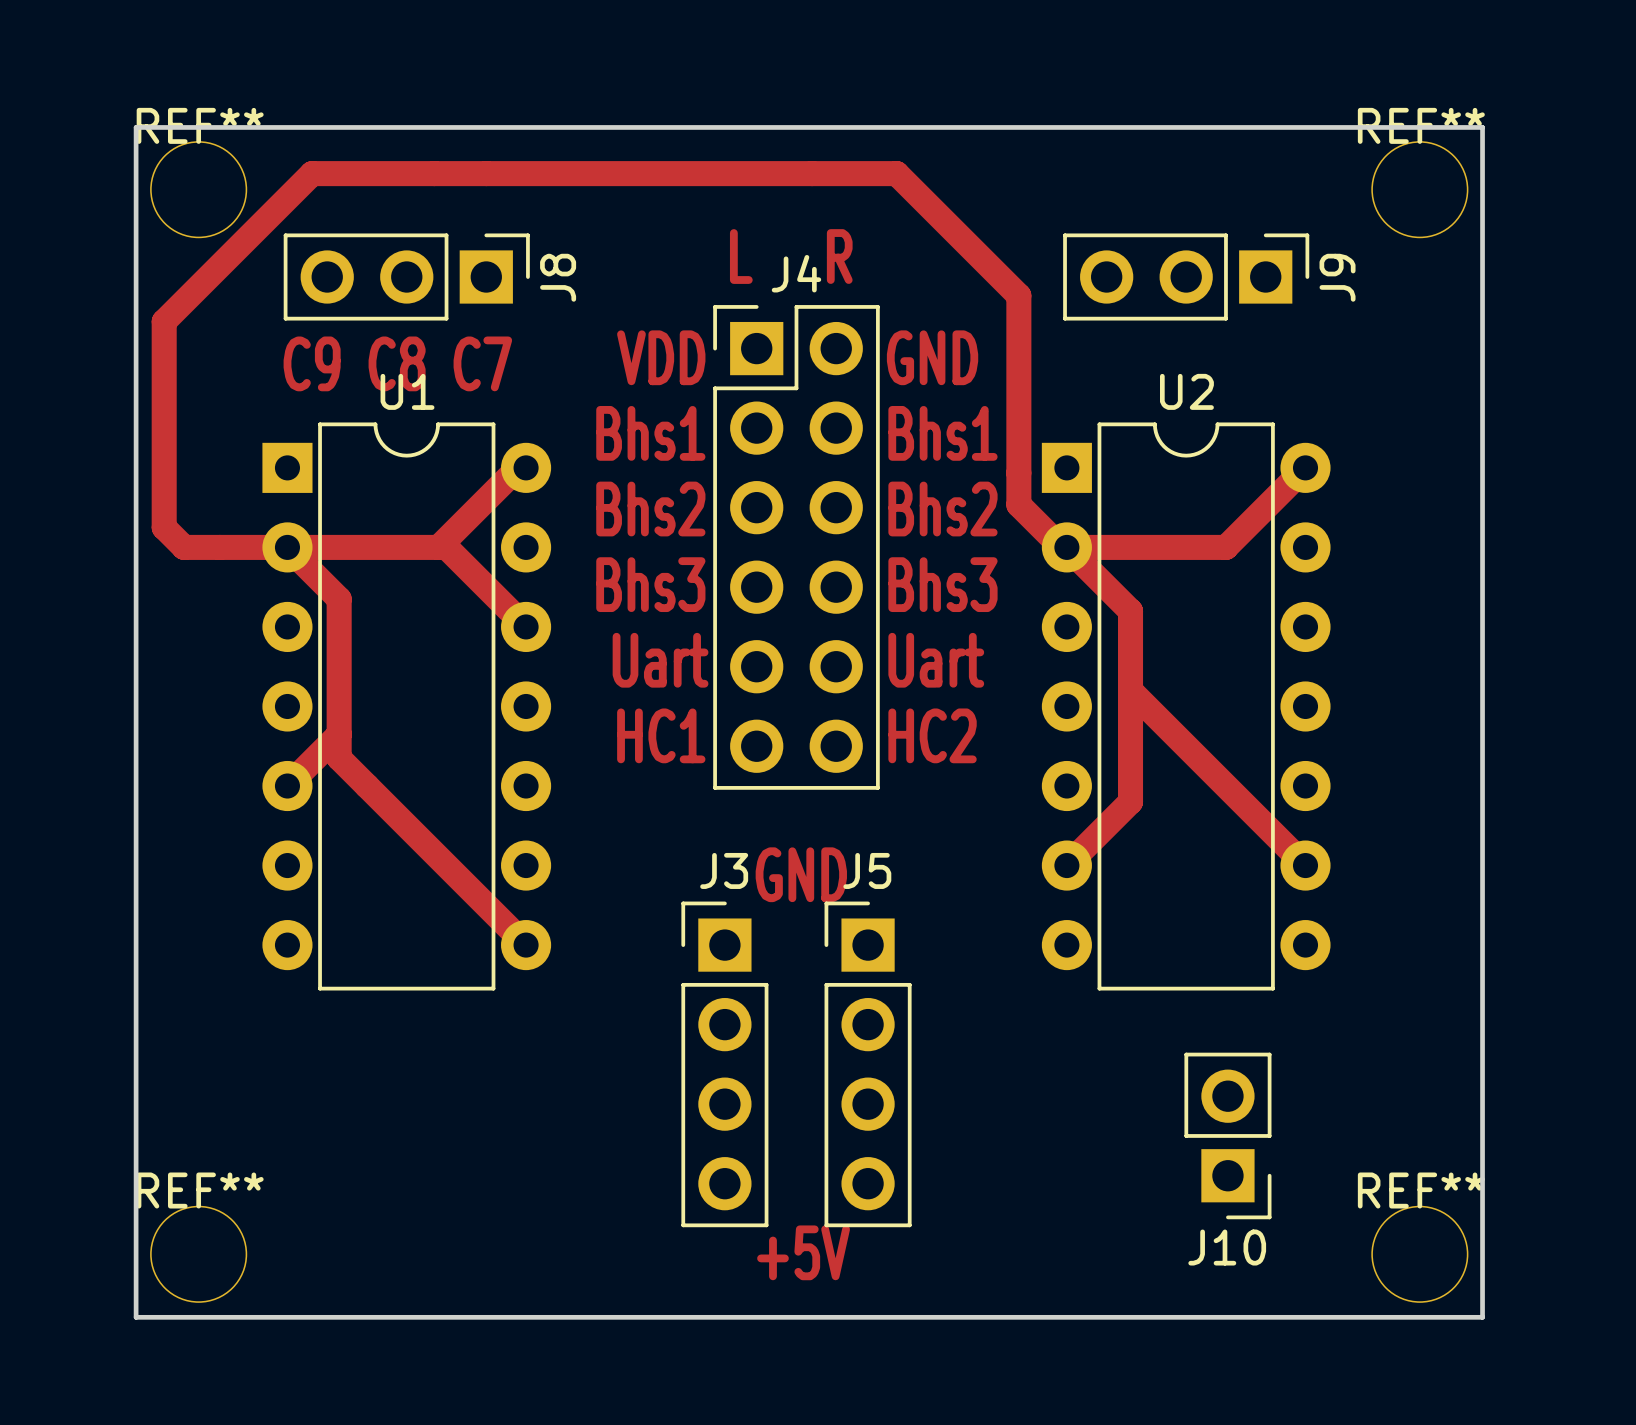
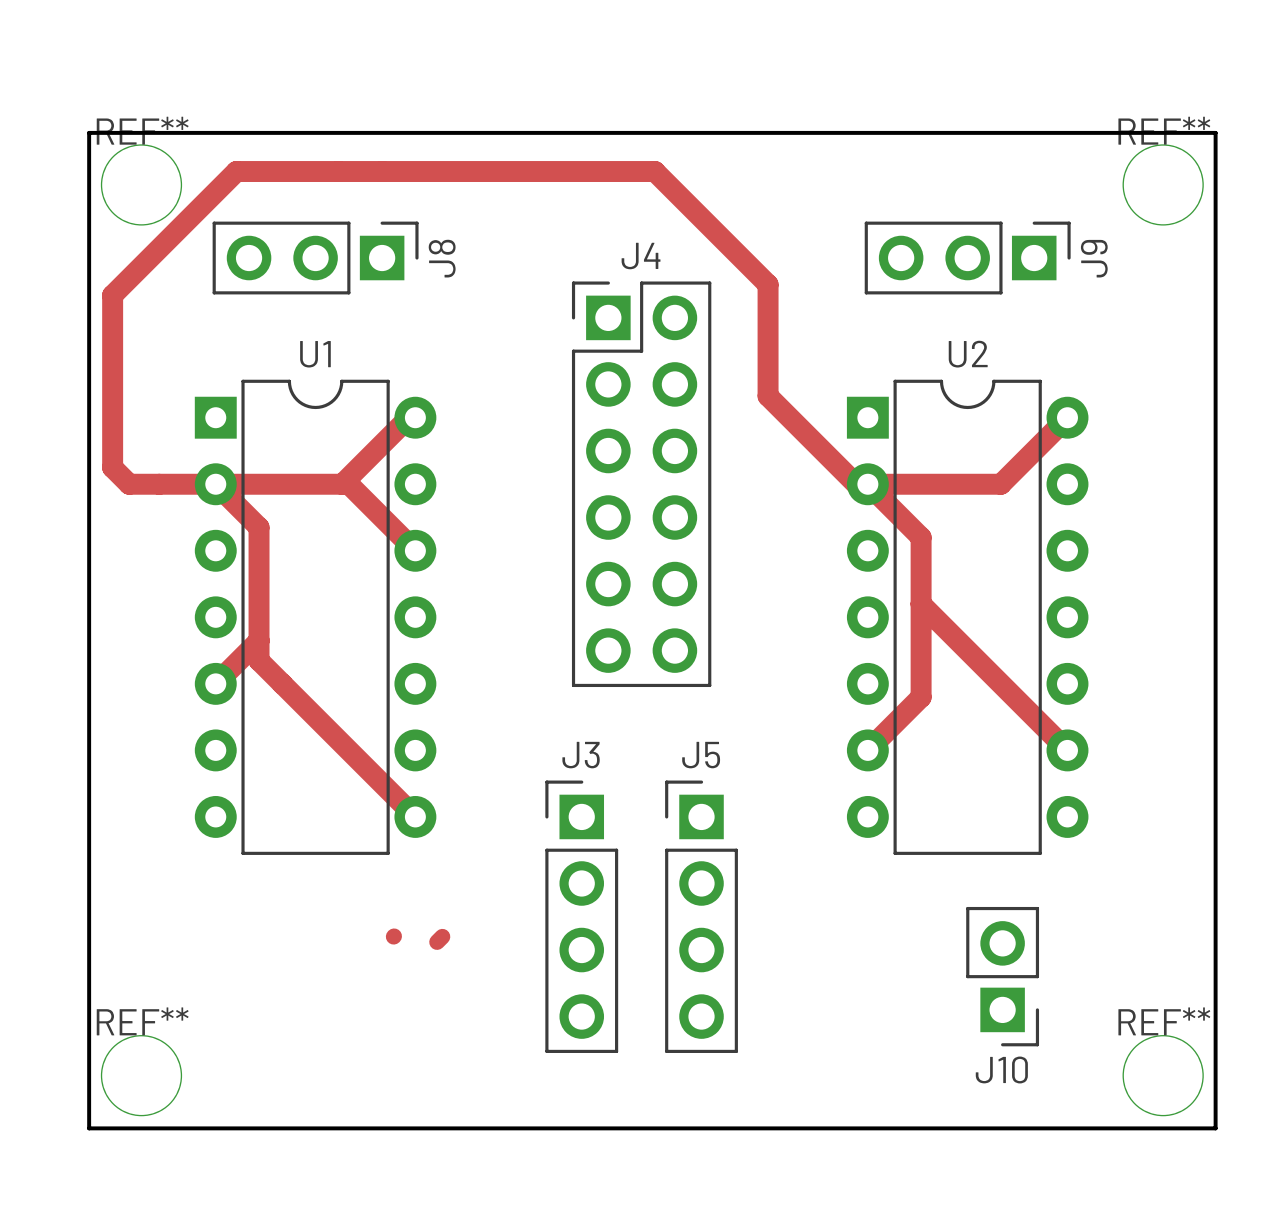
track: (812, 173) (896, 173) (1018, 295) (1018, 504) (1061, 547) (1066, 547) -> (654, 171) (768, 284) (768, 396) (856, 484)
text: L R (791, 256) -> none
text: VDD (661, 357) -> none
text: GND (932, 357) -> none
text: C9 C8 C7 (397, 363) -> none
text: Bhs1 (650, 433) -> none
text: Bhs1 (942, 433) -> none
text: Bhs2 (650, 509) -> none
text: Bhs2 (942, 509) -> none
text: Bhs3 (650, 584) -> none
text: Bhs3 (942, 584) -> none
text: Uart (660, 660) -> none
text: Uart (936, 660) -> none
text: HC1 (661, 735) -> none
text: HC2 (932, 735) -> none
text: GND (801, 874) -> none
track: none -> (394, 936) (393, 936)
track: none -> (442, 936) (437, 942)
text: +5V (803, 1252) -> none

